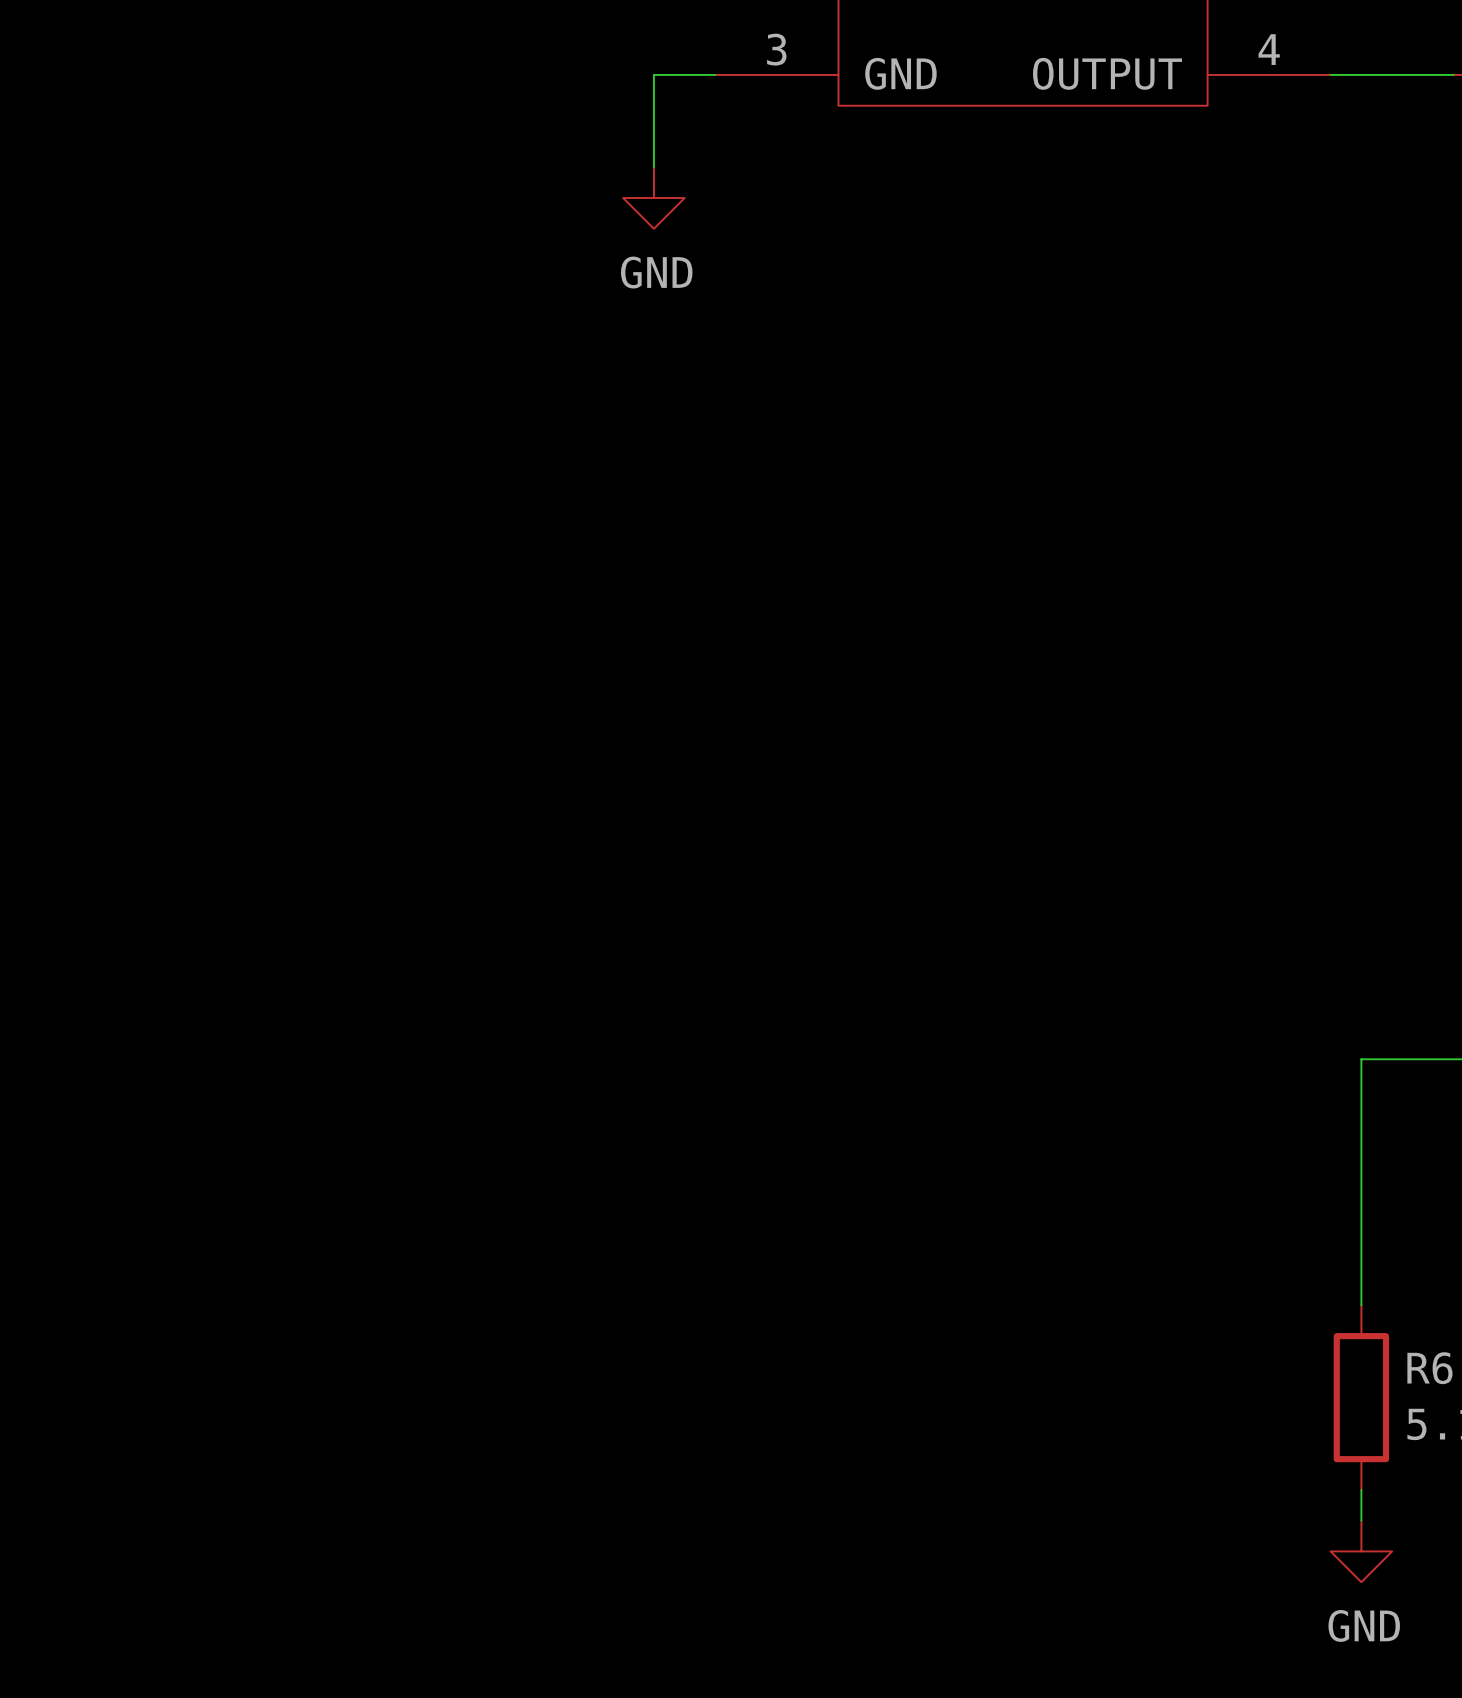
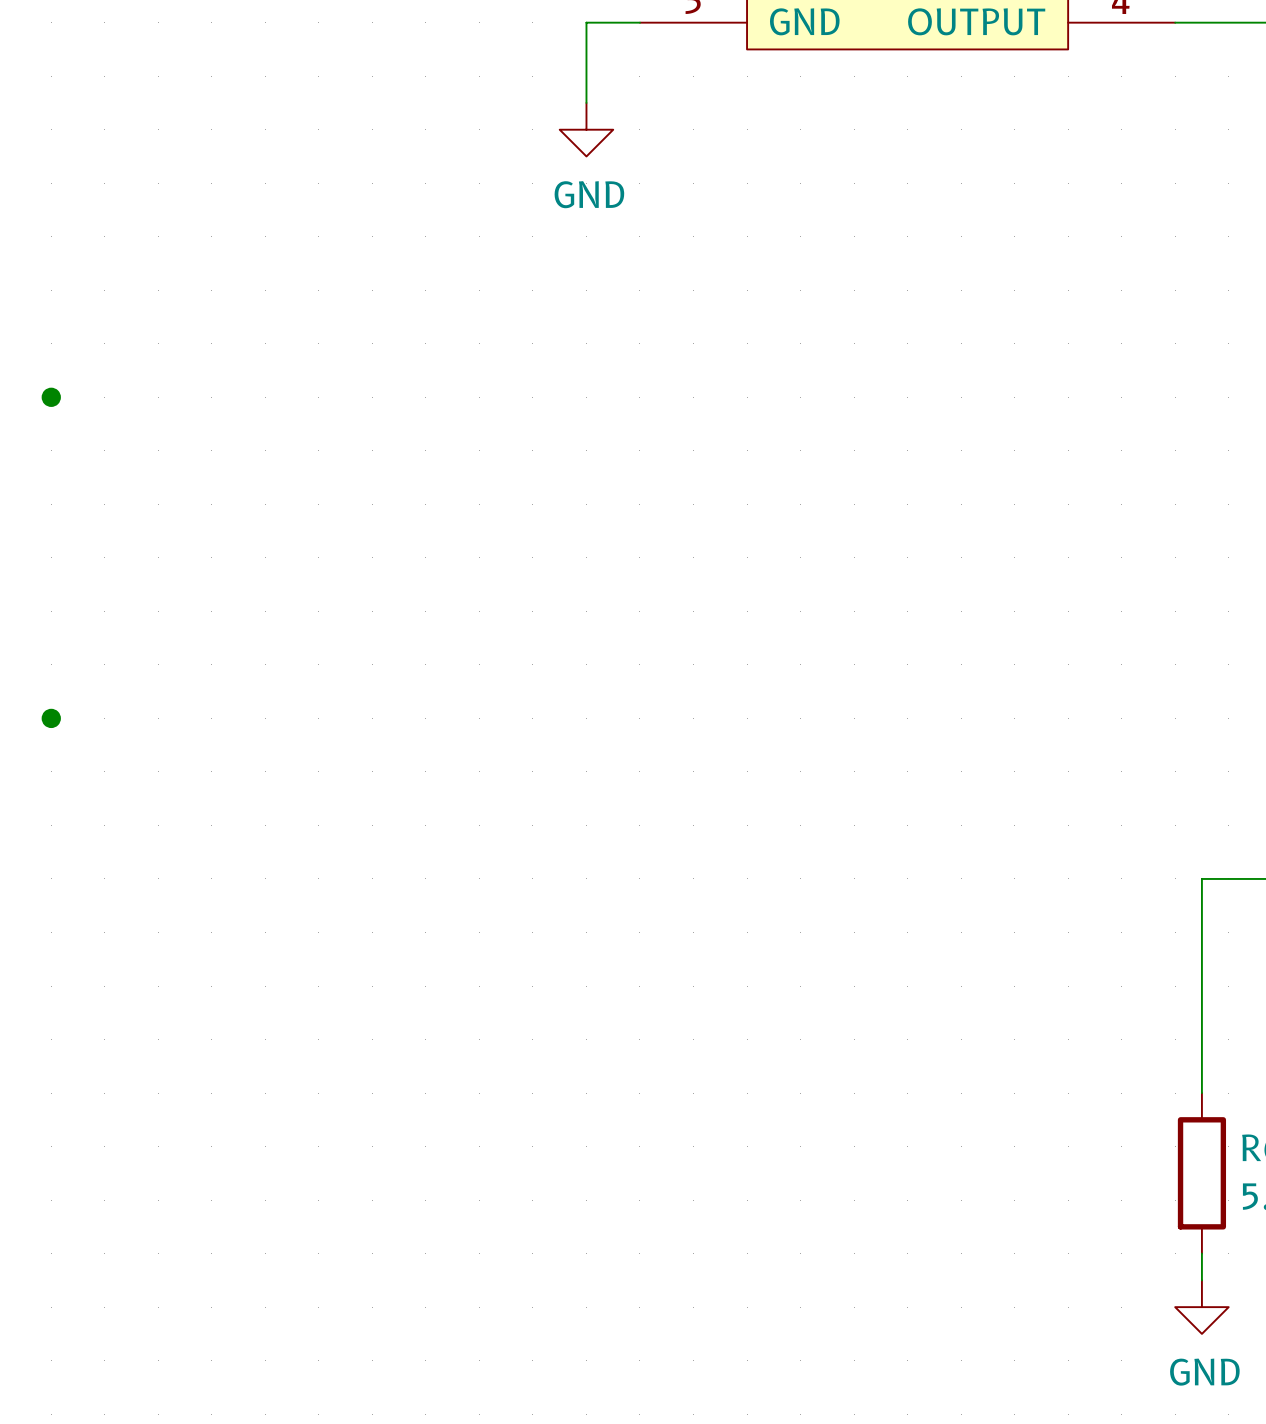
junction: none -> (51, 397)
junction: none -> (51, 718)

